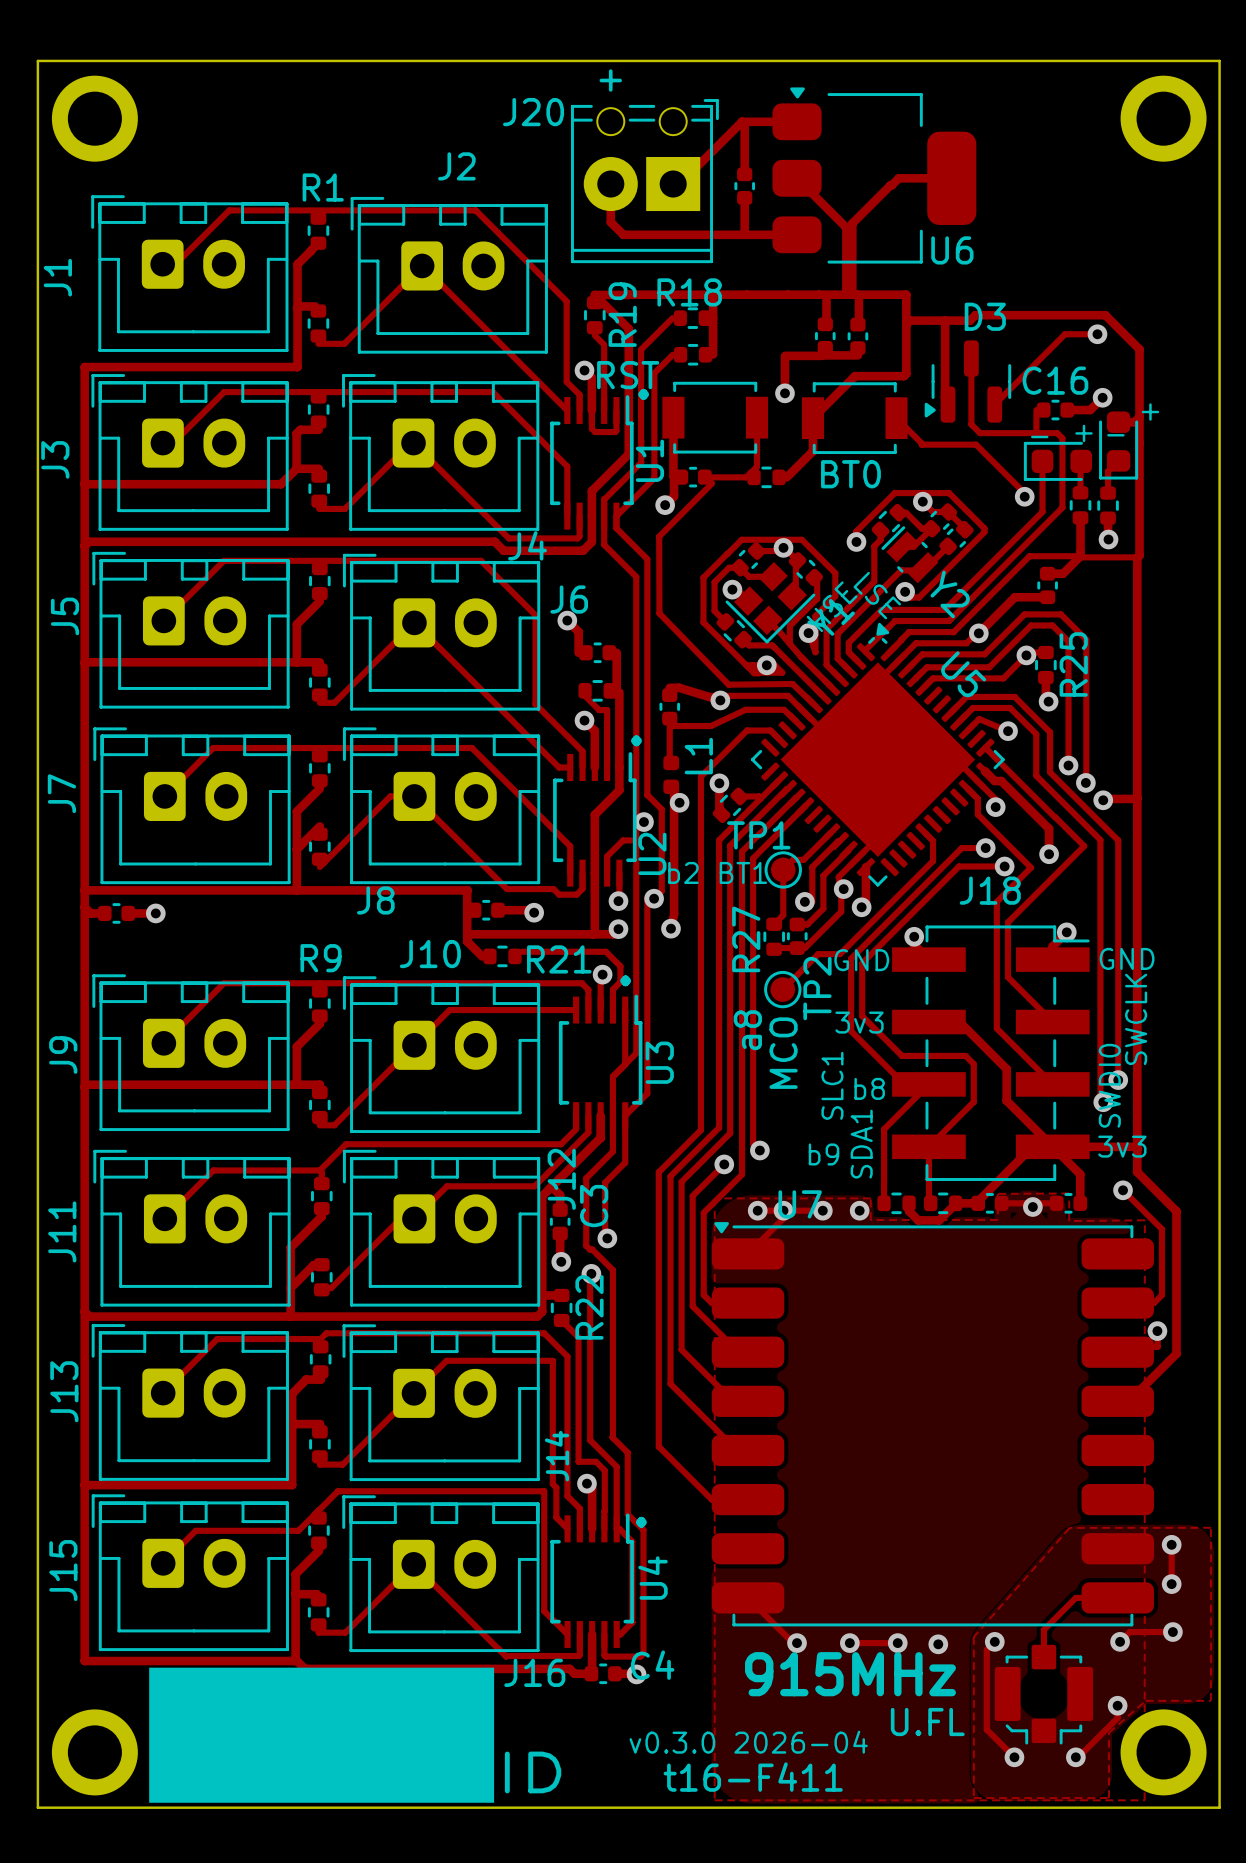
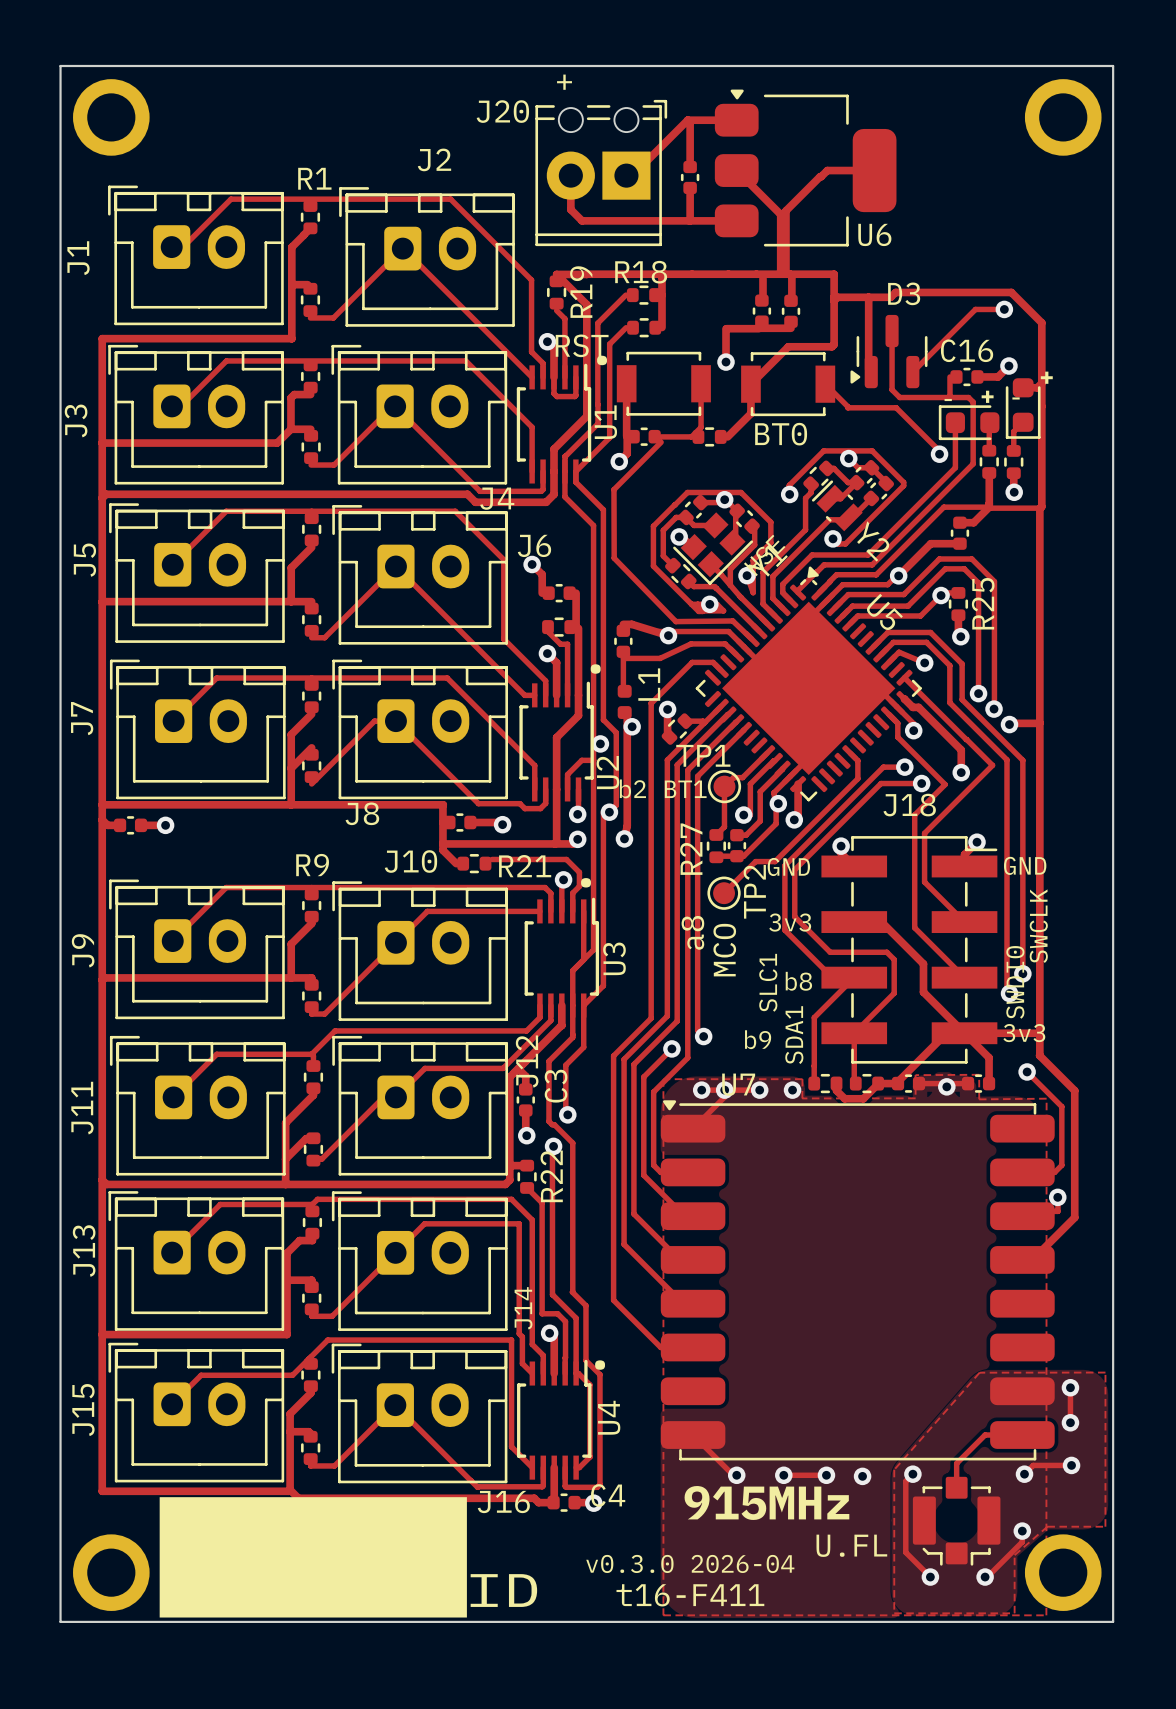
text: LSE (877, 595) -> none

